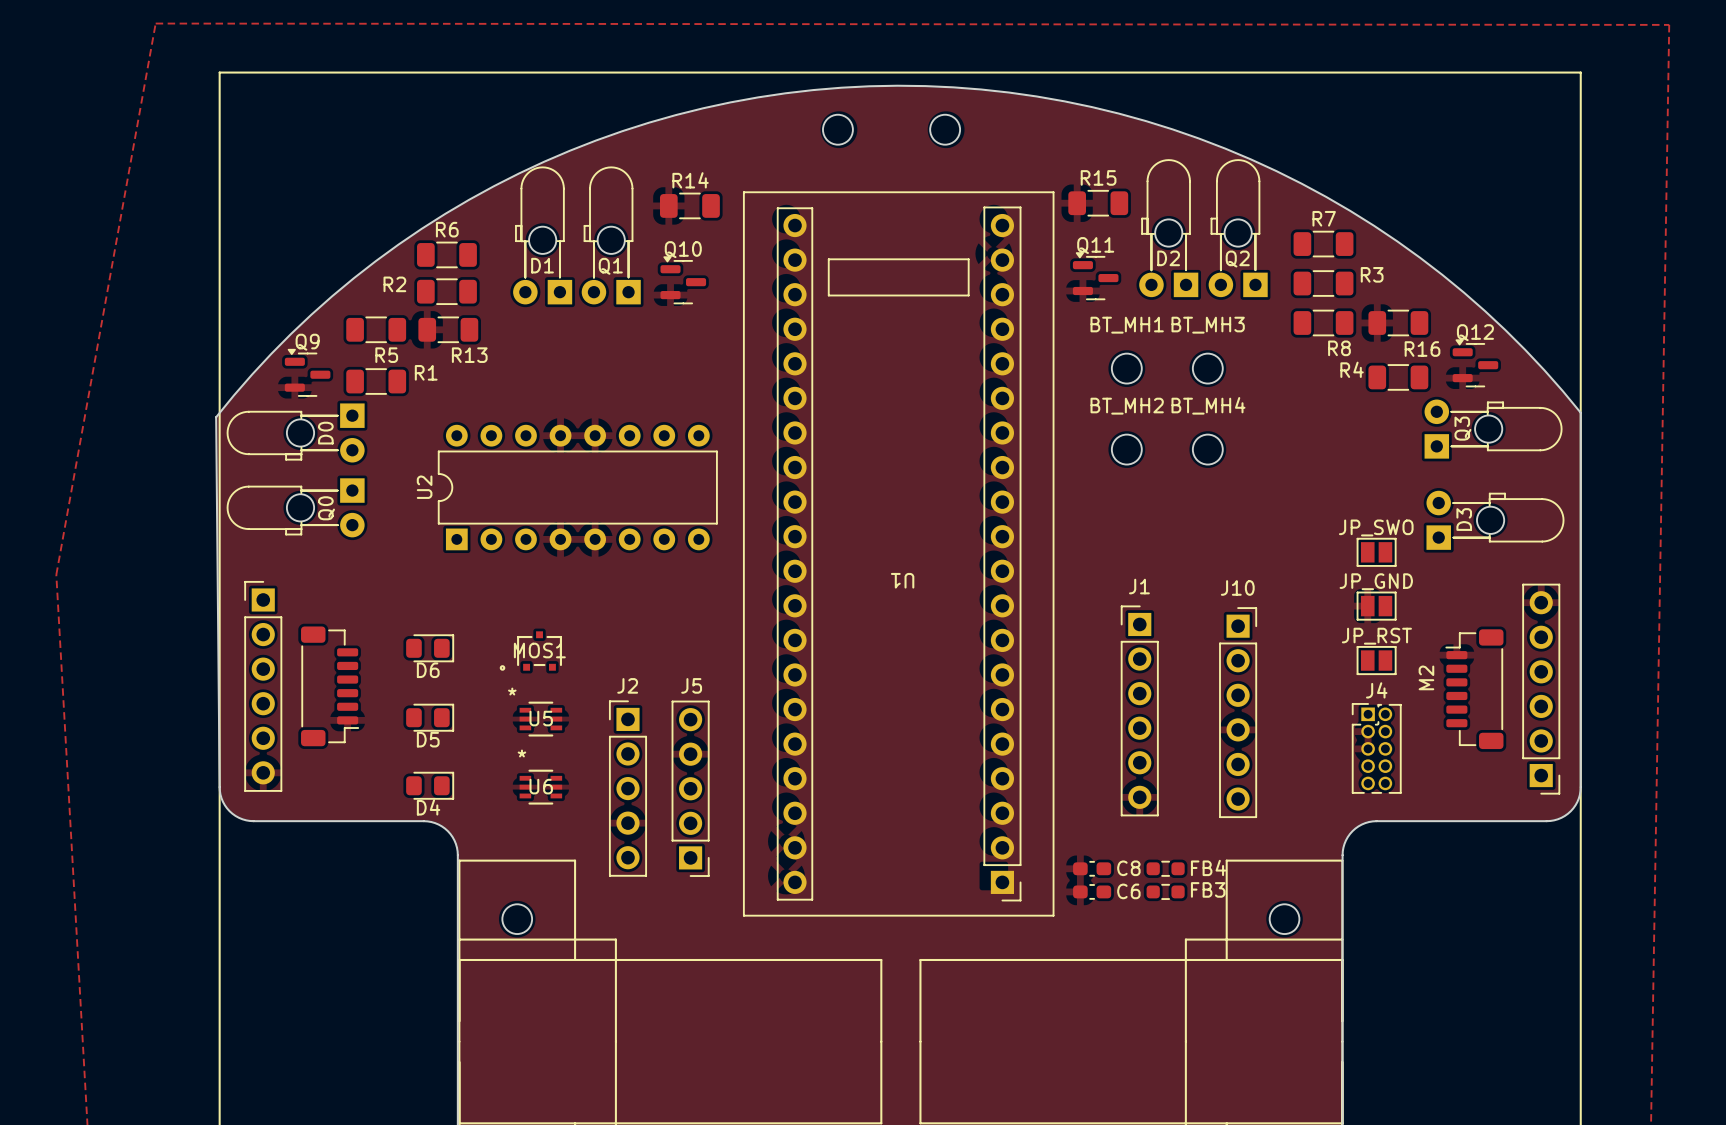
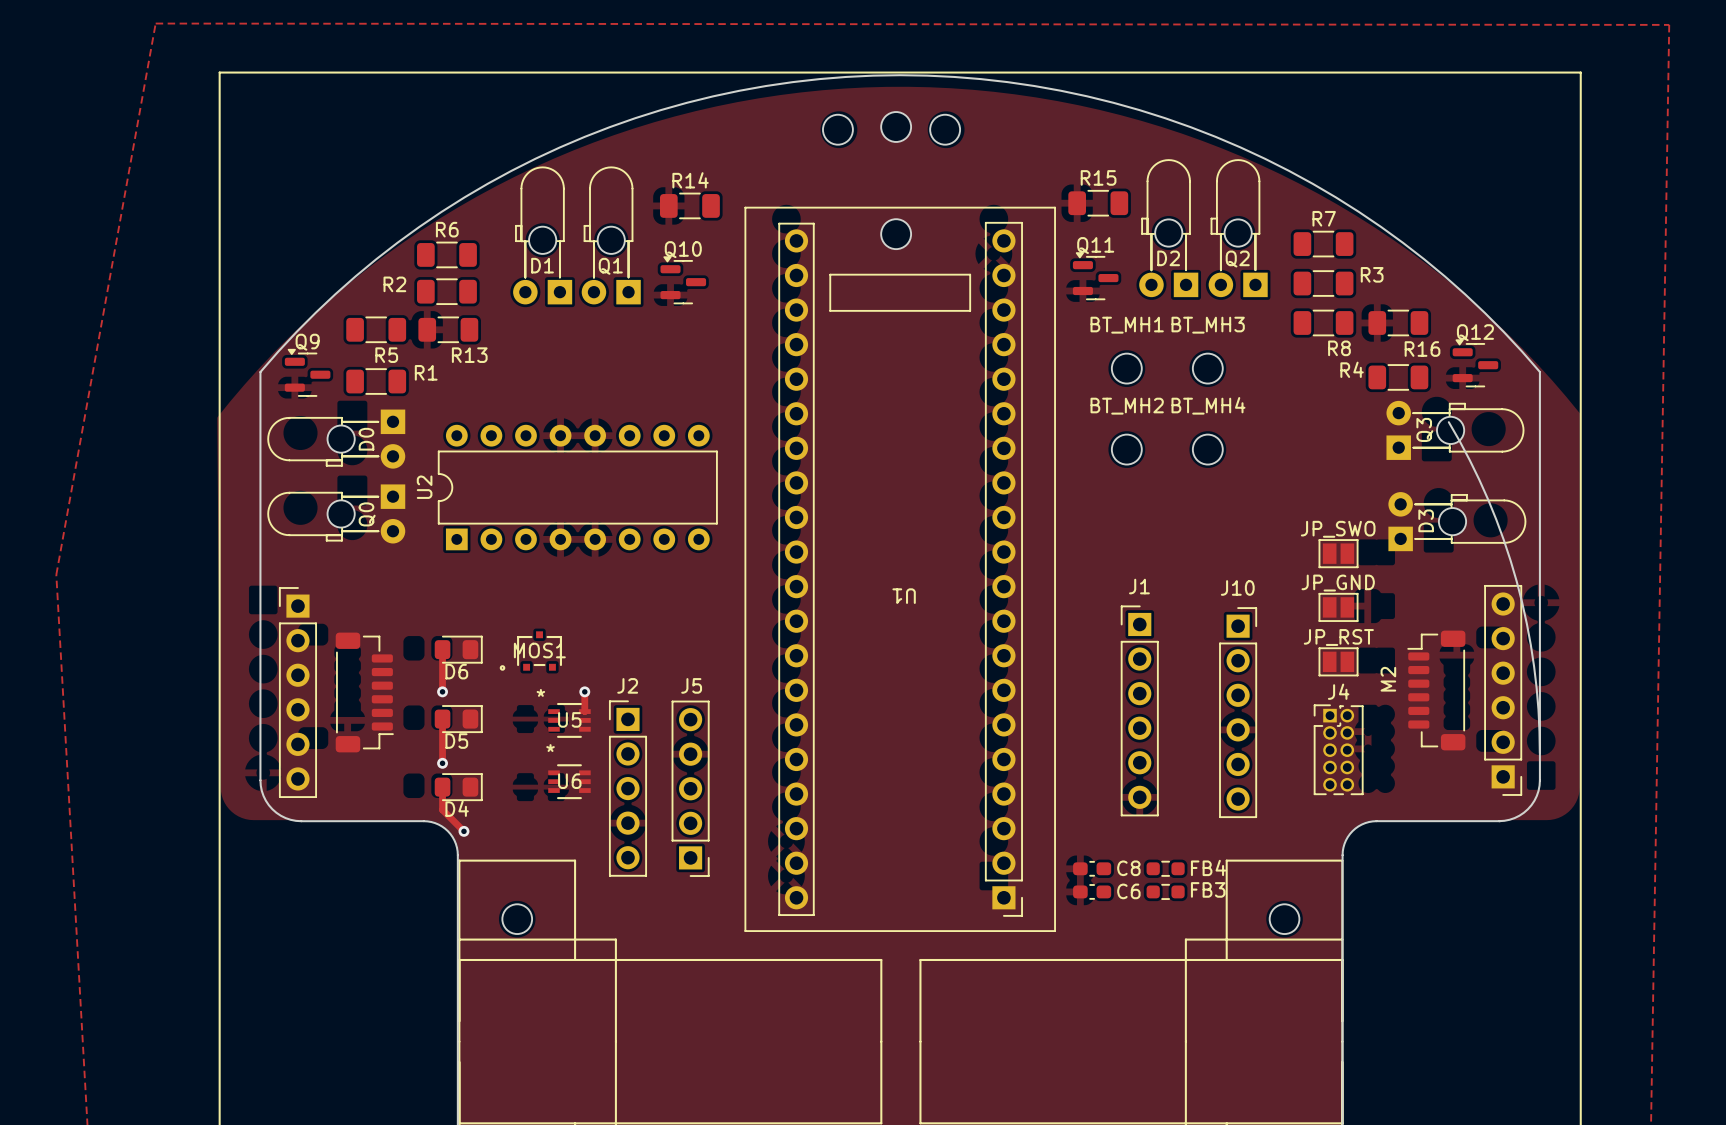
part: none -> (896, 126)
part: none -> (896, 234)
board edge: none -> (1448, 422) (1488, 499) (1516, 581) (1534, 666) (1539, 753)
Q3 position: (1493, 429) -> (1455, 430)
D0 position: (295, 432) -> (336, 439)
Q0 position: (295, 507) -> (336, 513)
D3 position: (1495, 520) -> (1457, 521)
JP_SWO position: (1376, 552) -> (1338, 553)
U1 position: (898, 553) -> (900, 569)
JP_GND position: (1376, 606) -> (1338, 607)
D6 position: (430, 648) -> (458, 649)
track: none -> (442, 649) (442, 691)
JP_RST position: (1376, 660) -> (1338, 661)
part position: (301, 686) -> (336, 692)
M2 position: (1502, 689) -> (1464, 690)
via: none -> (442, 691)
track: none -> (584, 691) (584, 711)
via: none -> (584, 691)
D5 position: (430, 717) -> (458, 719)
track: none -> (442, 719) (442, 763)
U5 position: (540, 719) -> (569, 720)
J4 position: (1376, 748) -> (1338, 749)
via: none -> (442, 763)
D4 position: (430, 785) -> (458, 787)
track: none -> (442, 787) (442, 809) (463, 831)
U6 position: (540, 787) -> (569, 781)
board edge: (423, 821) (249, 820) (232, 813) (223, 801) (219, 787) (216, 417) (252, 374) (290, 334) (353, 278) (421, 228) (469, 199) (518, 173) (596, 140) (649, 122) (703, 108) (758, 97) (813, 90) (897, 85) (981, 89) (1036, 96) (1091, 107) (1145, 121) (1199, 138) (1276, 171) (1326, 196) (1374, 225) (1442, 274) (1505, 330) (1544, 370) (1580, 412) (1579, 794) (1570, 811) (1557, 819) (1546, 821) (1500, 821) -> (423, 821) (295, 820) (276, 812) (263, 795) (260, 780) (260, 371) (296, 331) (335, 294) (397, 242) (441, 211) (487, 183) (559, 147) (635, 118) (713, 96) (765, 86) (819, 79) (900, 75) (980, 79) (1034, 86) (1087, 96) (1139, 110) (1190, 127) (1264, 158) (1335, 197) (1402, 242) (1465, 294) (1503, 331) (1539, 371) (1539, 785) (1534, 800) (1523, 812) (1509, 819) (1499, 821)
via: none -> (463, 831)

